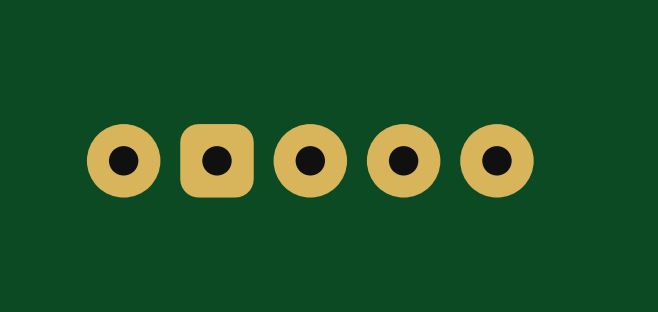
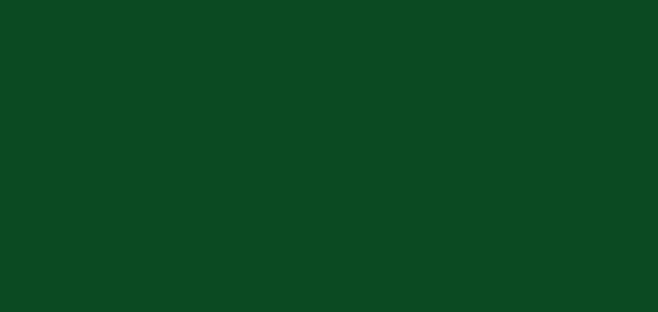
part: (310, 160) -> none

